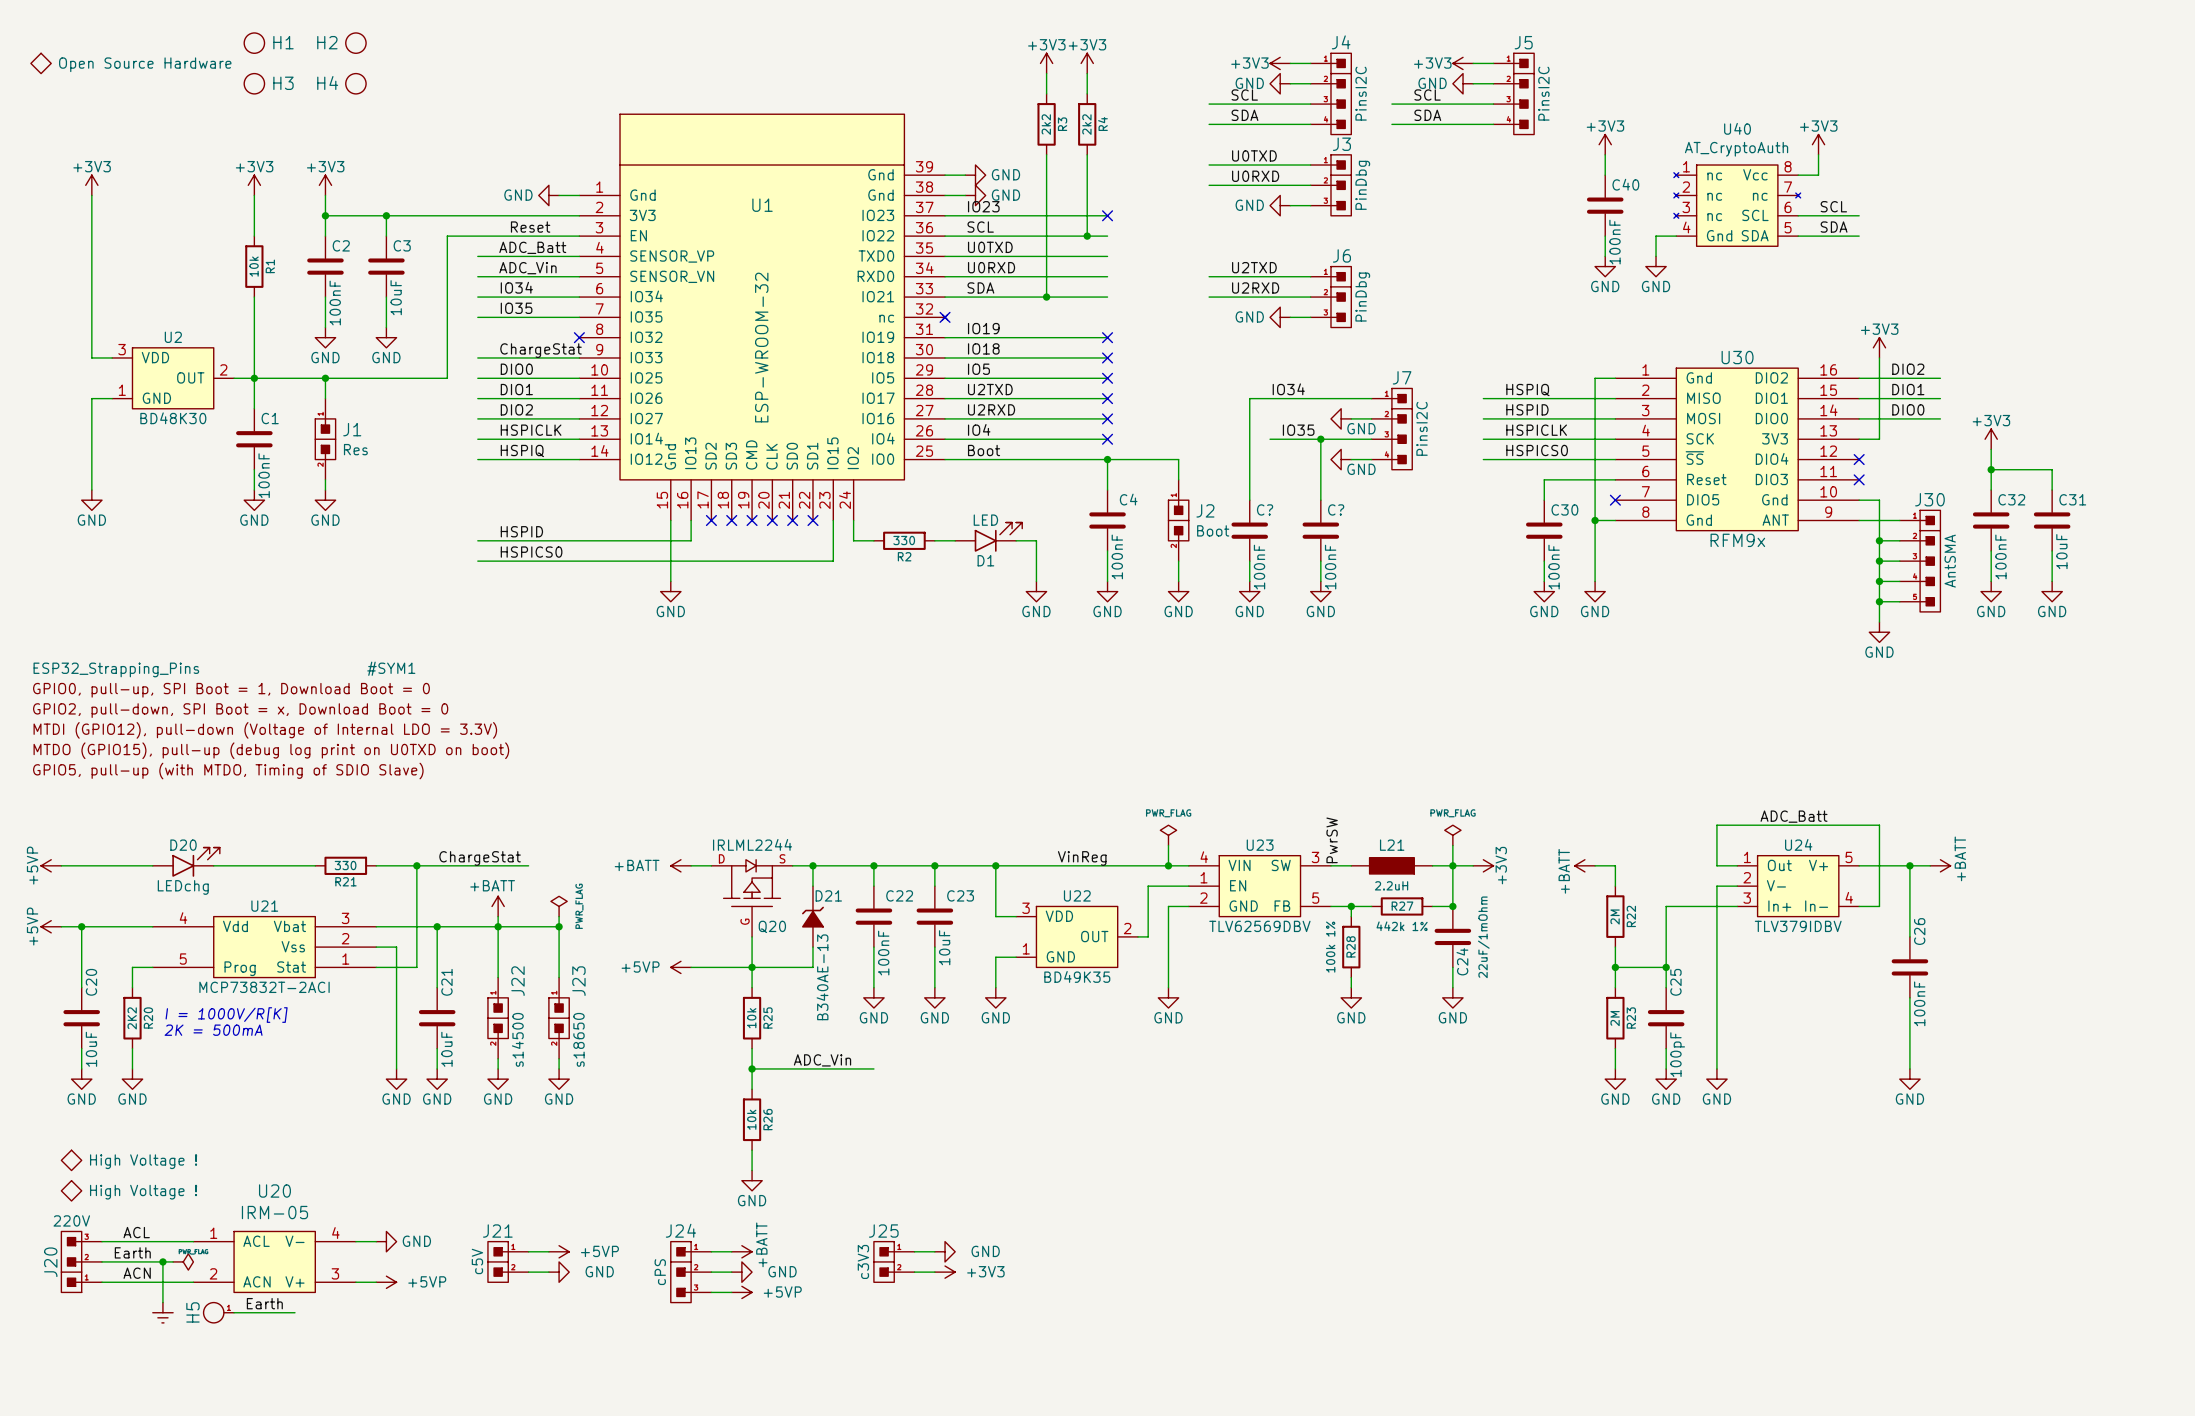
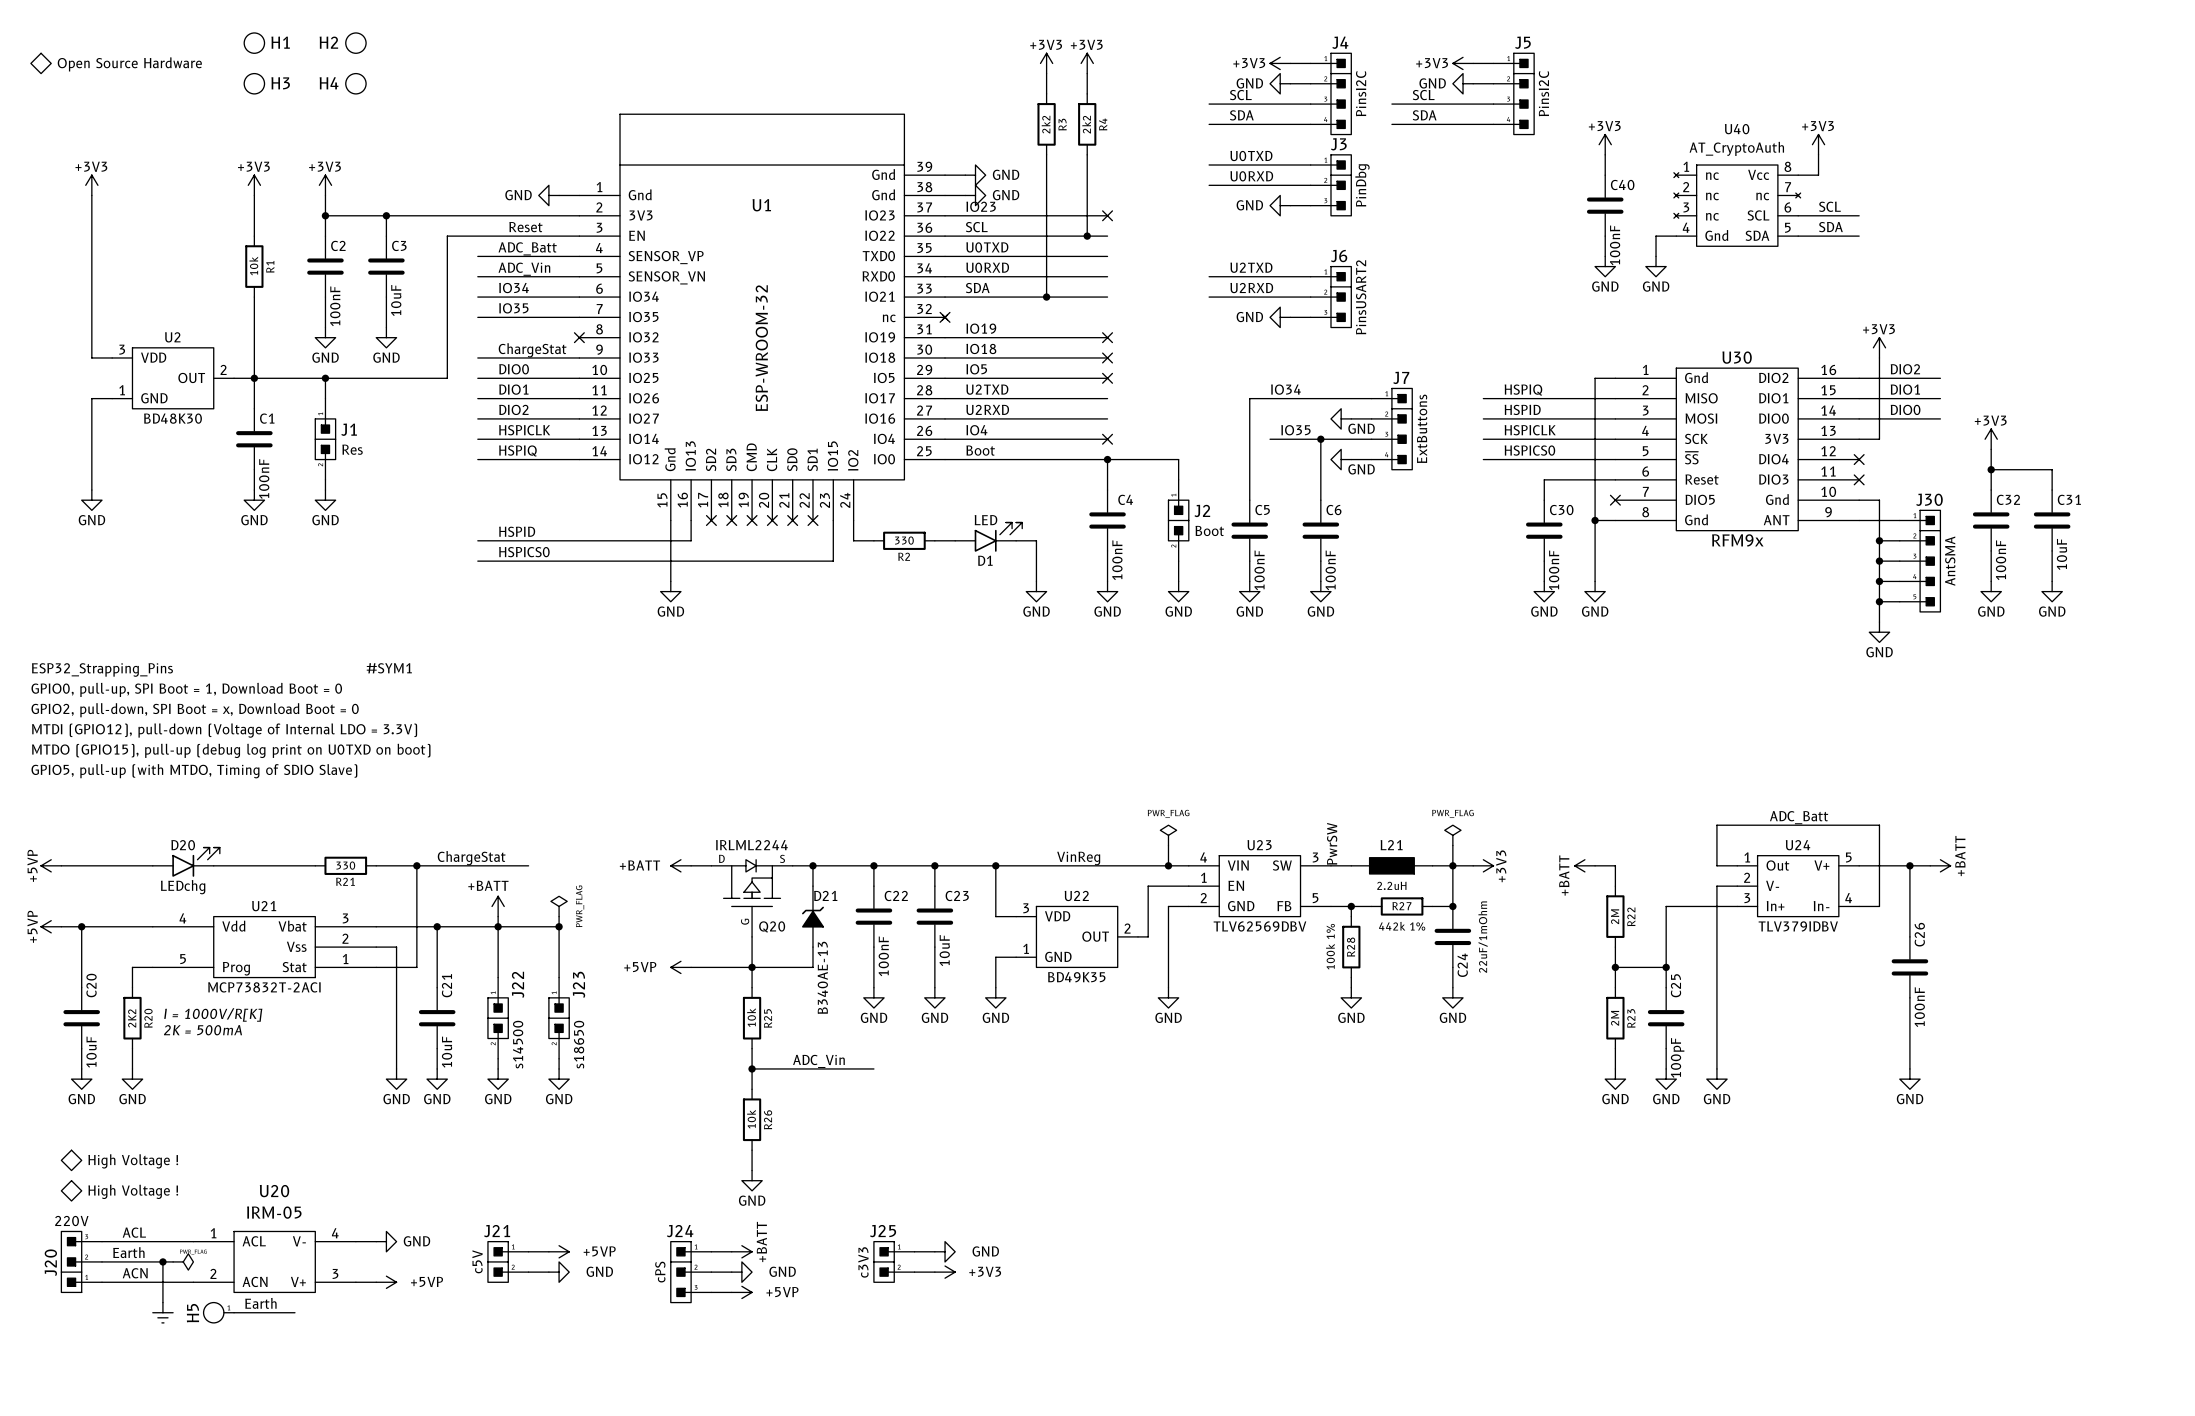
J6 value: PinDbg (1362, 297) -> PinsUSART2 (1361, 297)
no-connect mark: (1107, 398) -> none
no-connect mark: (1107, 418) -> none
J7 value: PinsI2C (1422, 428) -> ExtButtons (1422, 428)
C? name: C? (1265, 509) -> C5 (1262, 510)
C? name: C? (1336, 509) -> C6 (1333, 510)

